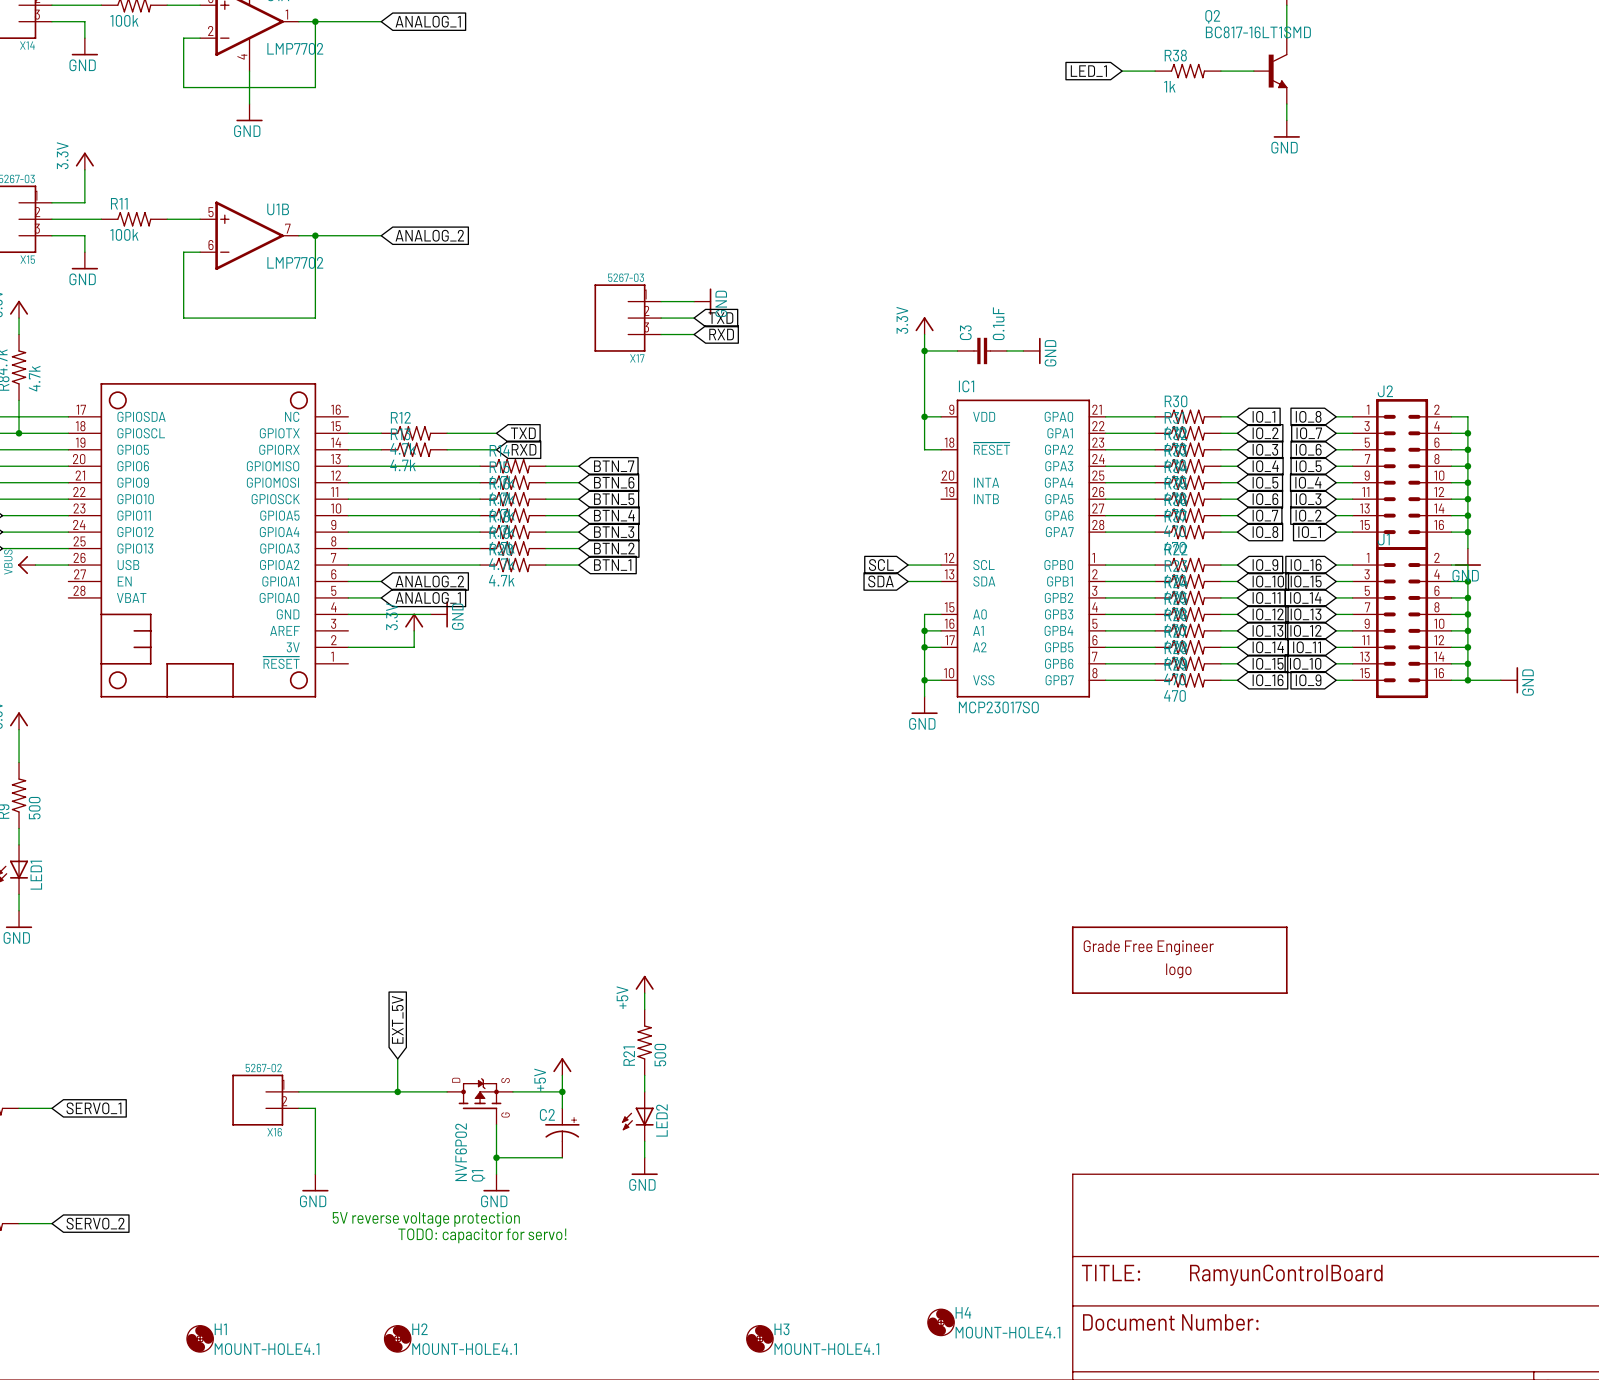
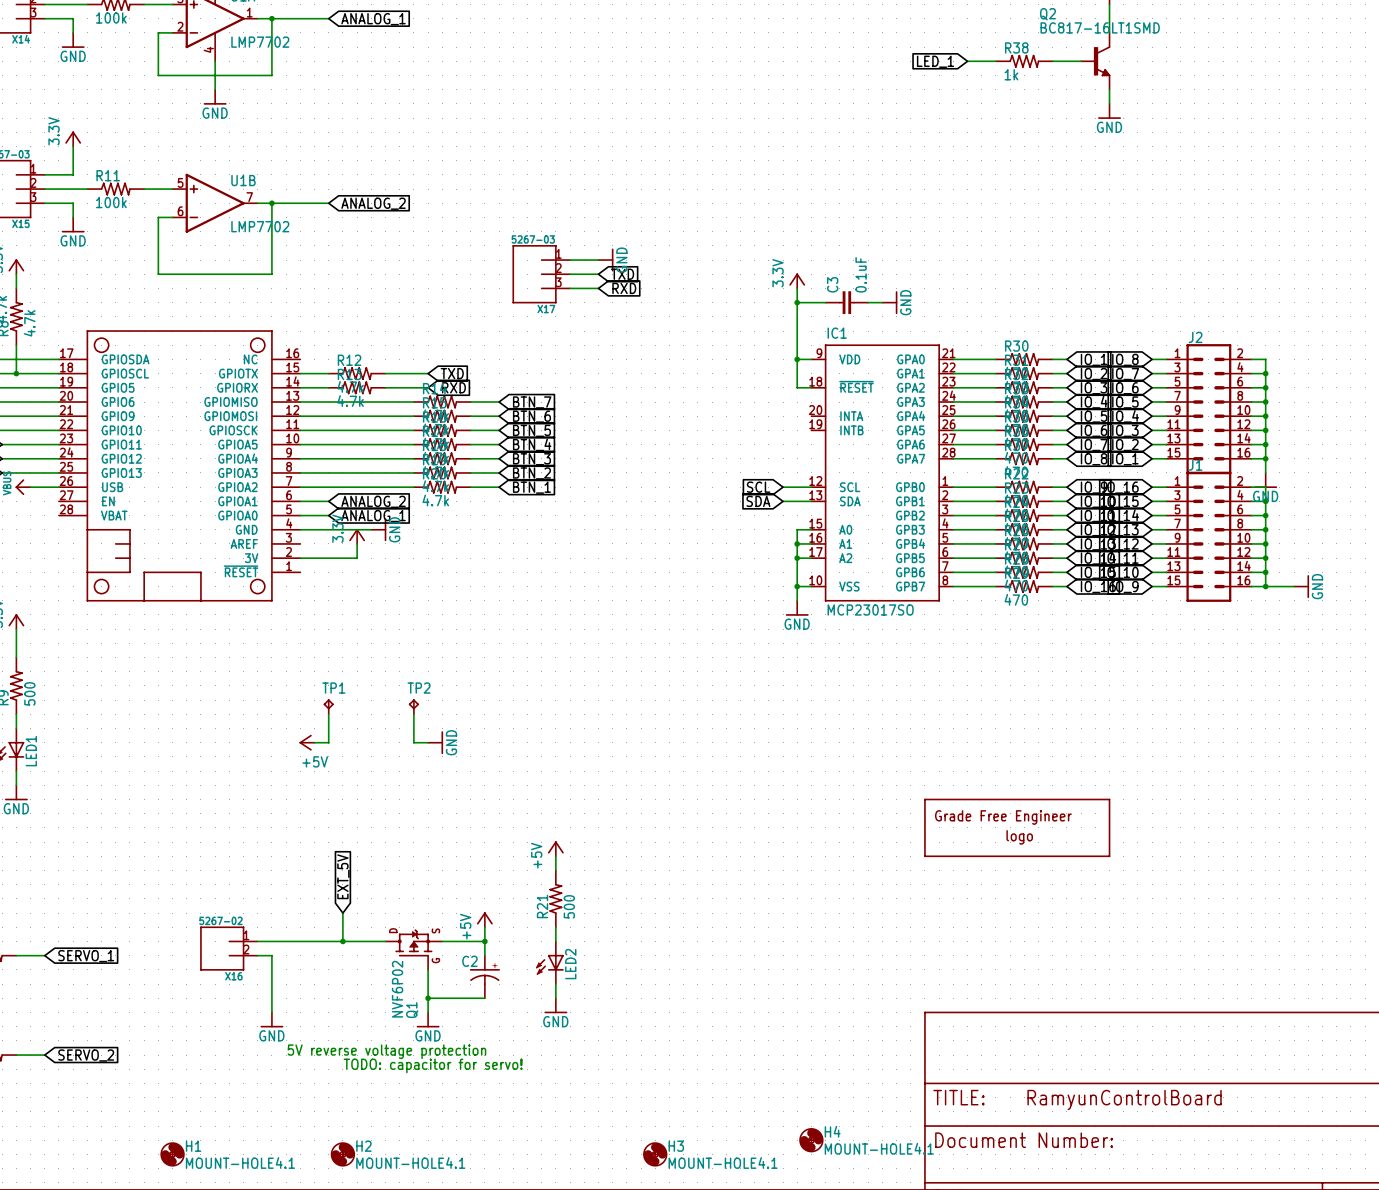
TP1: none -> (328, 706)
TP2: none -> (413, 706)
wire: none -> (328, 714) (328, 742) (314, 742)
wire: none -> (413, 714) (413, 742) (428, 742)
power symbol: none -> +5V (307, 742)
power symbol: none -> GND (435, 742)

